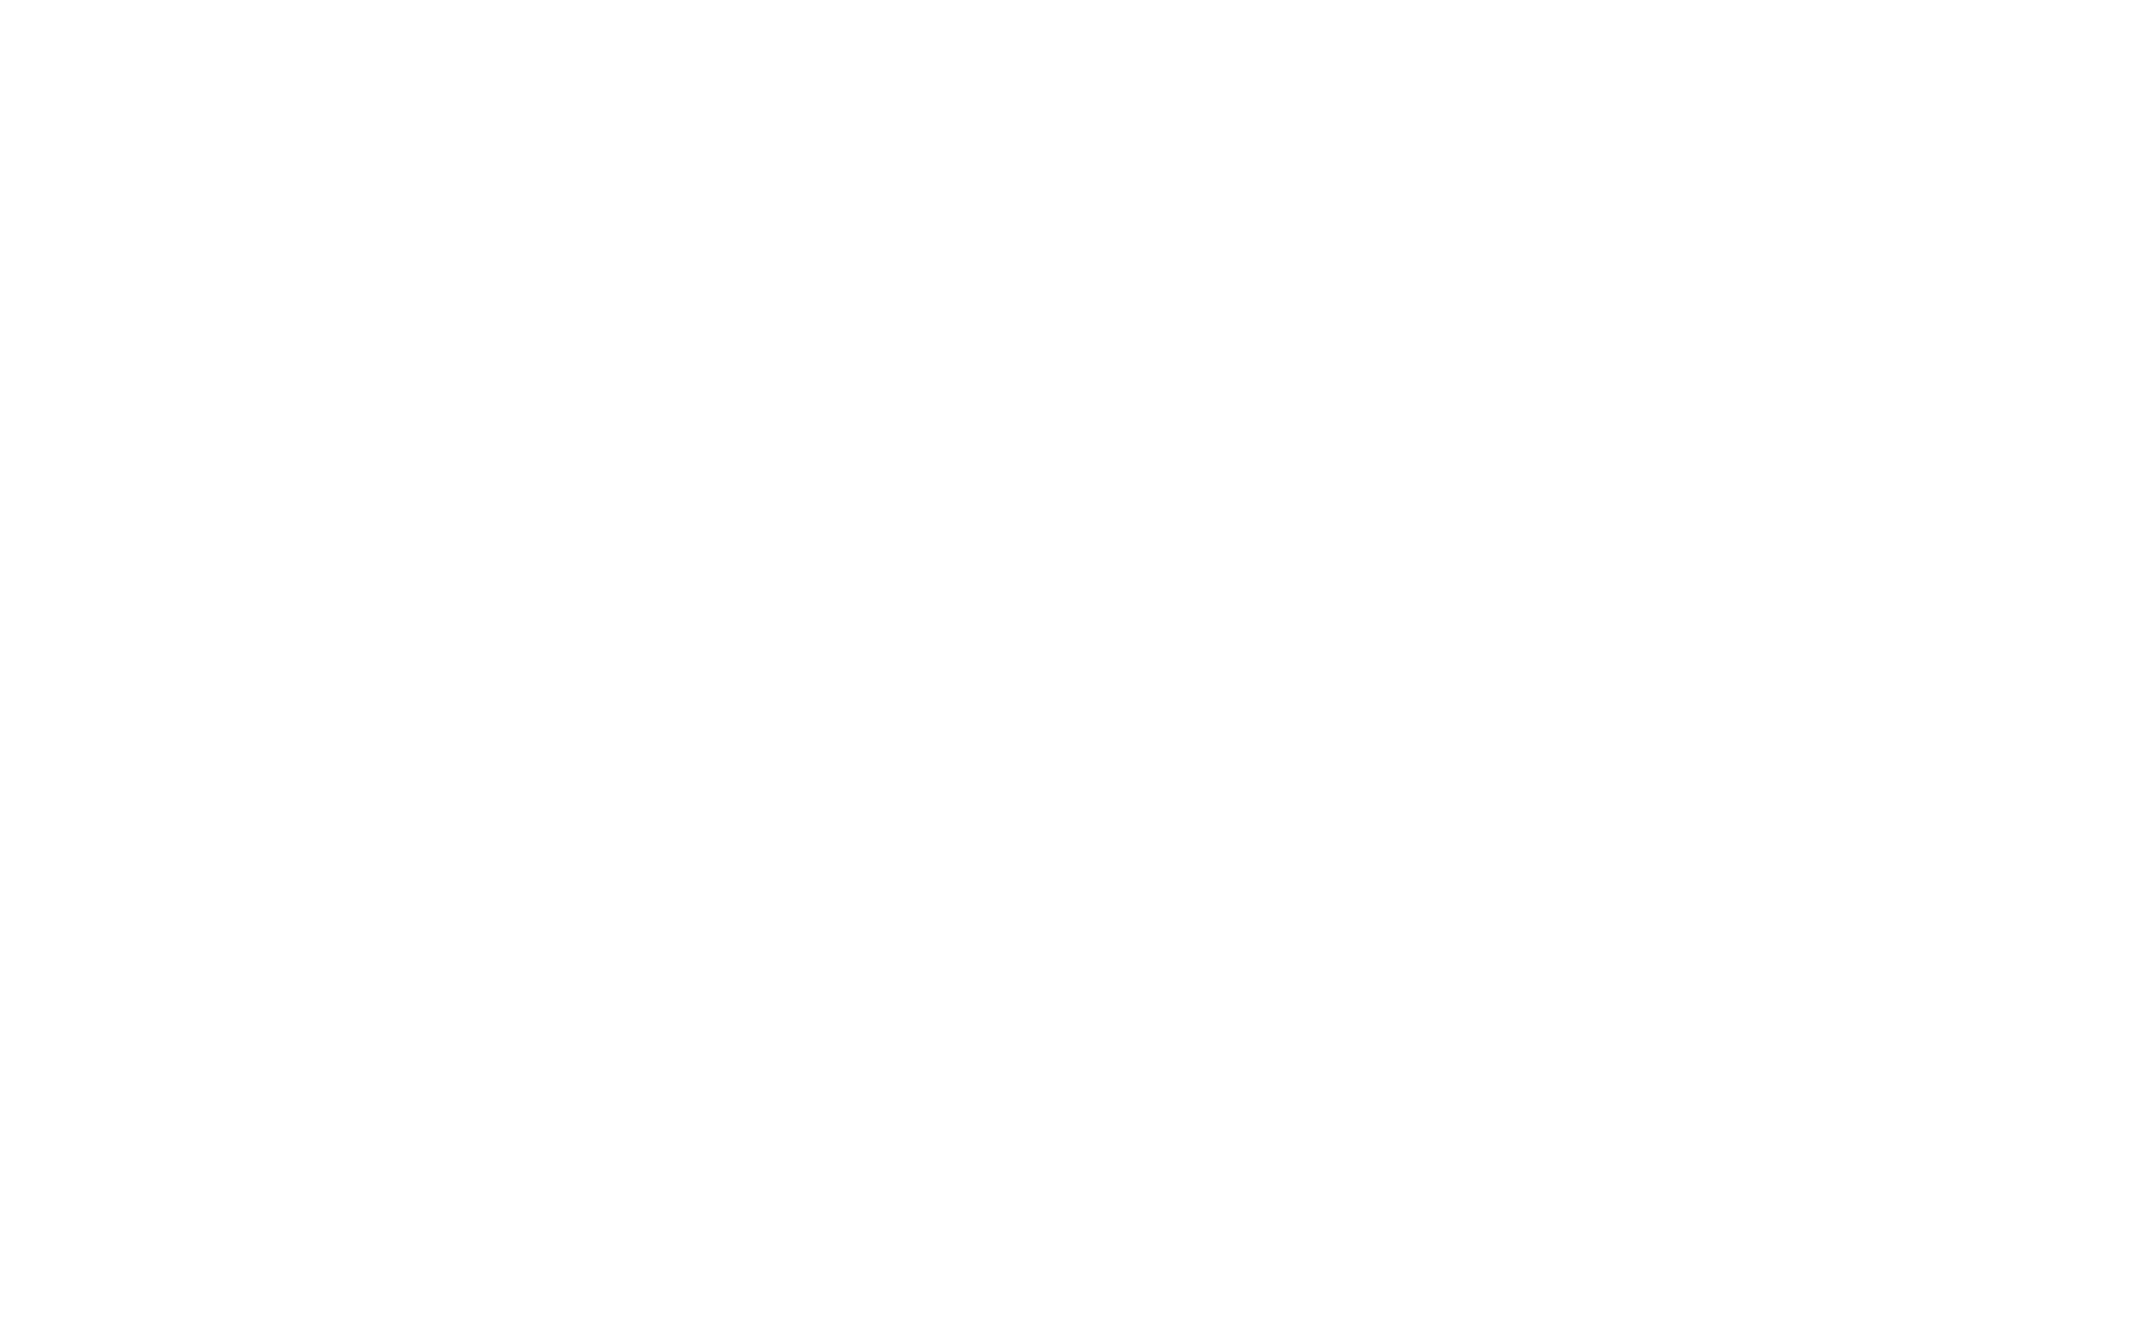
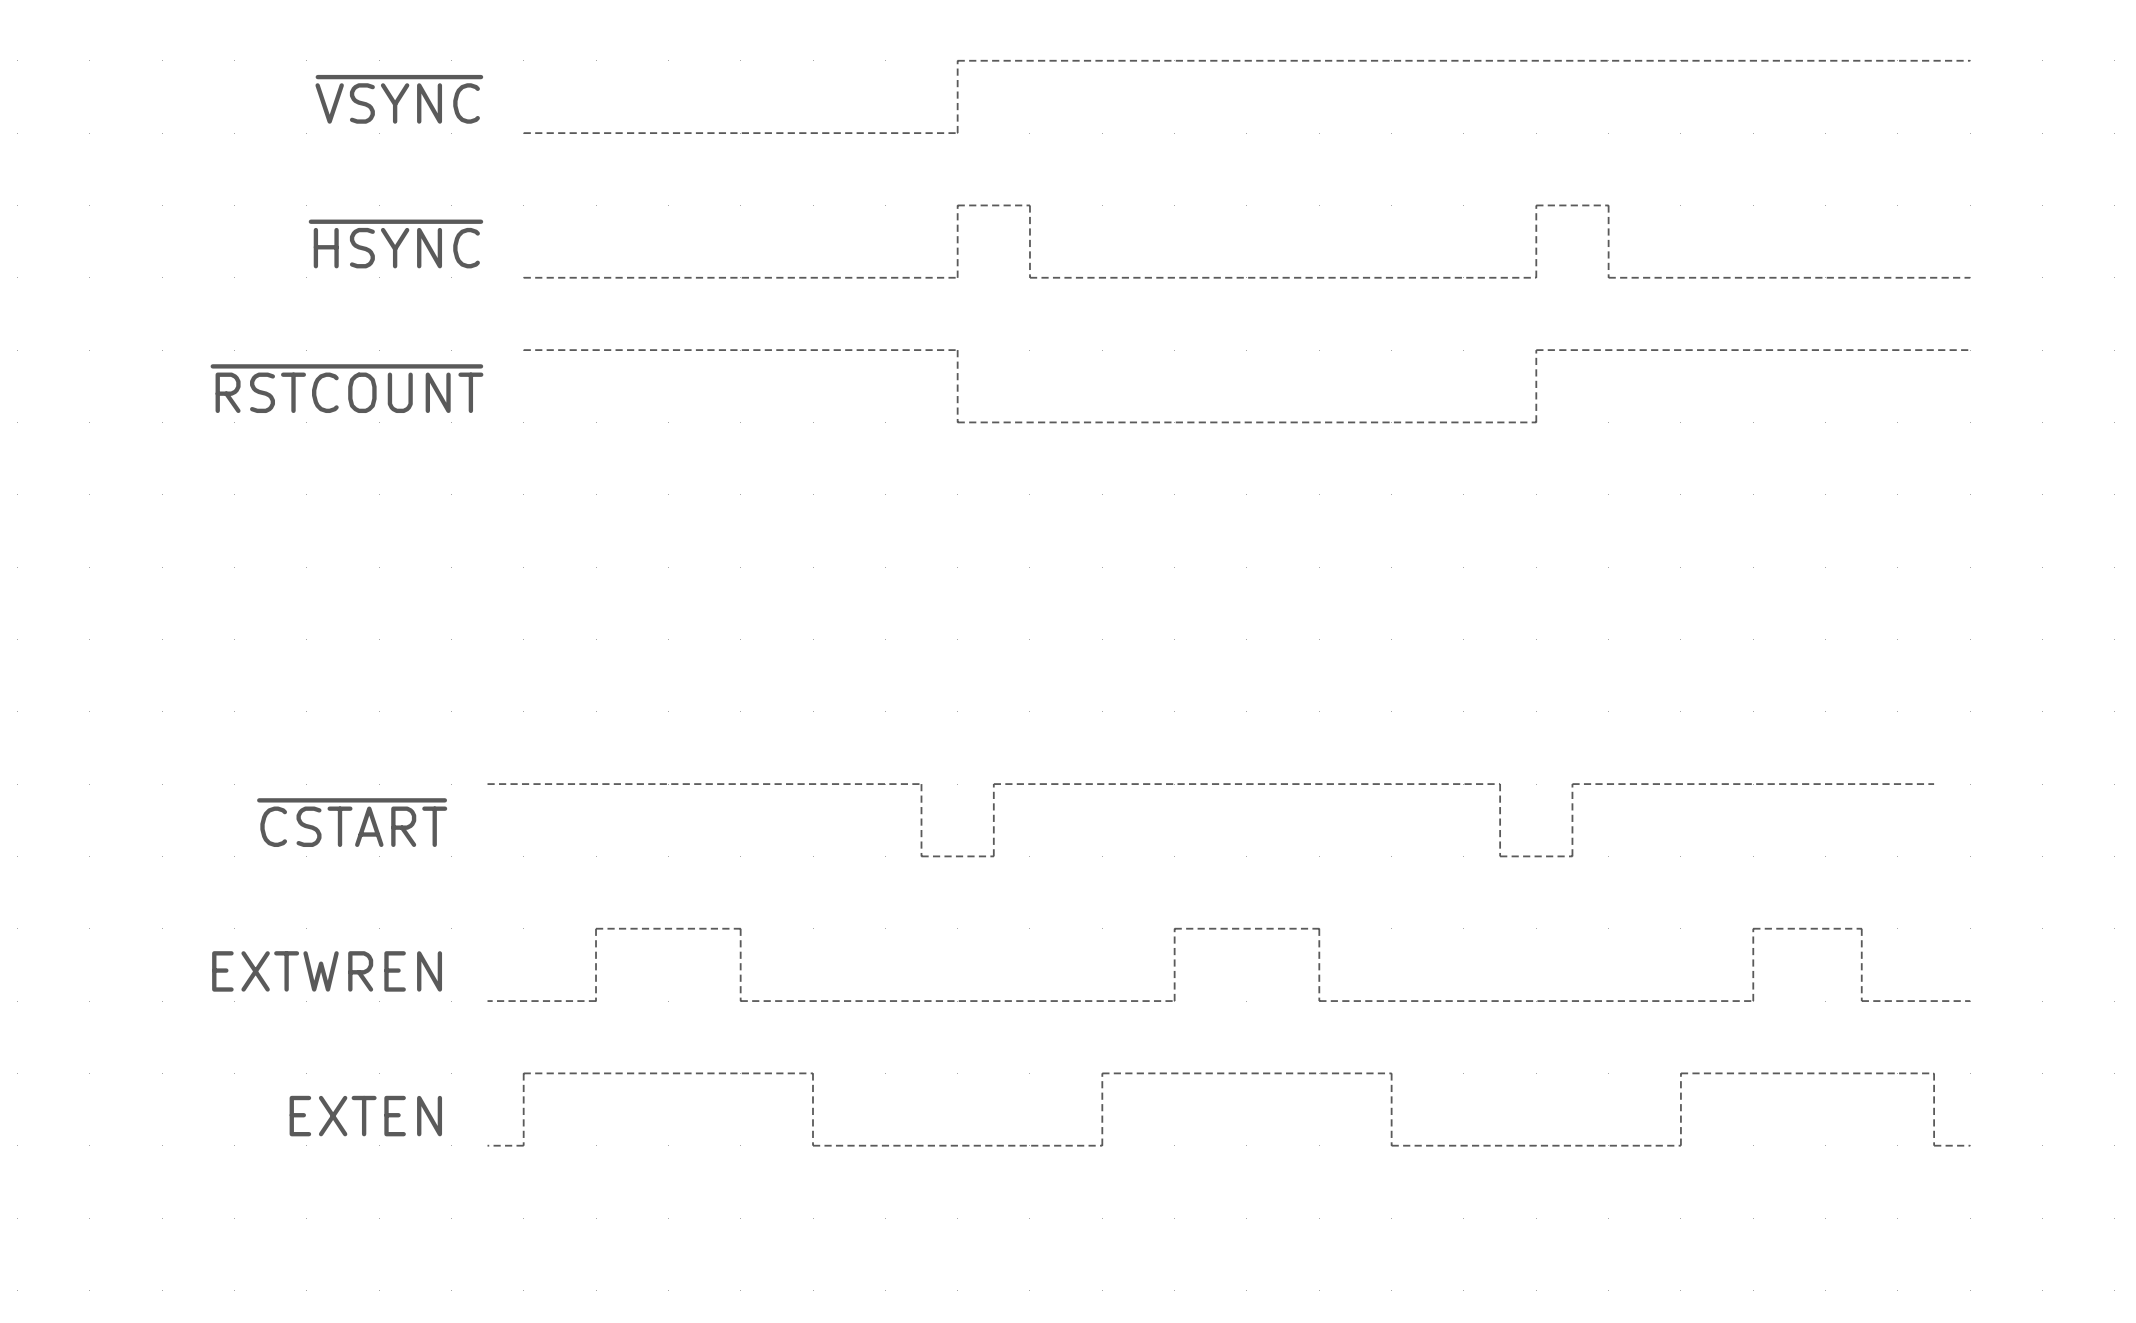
line: none -> (1970, 60) (957, 60) (957, 133) (523, 133)
text: none -> ~{VSYNC} (399, 99)
text: none -> ~{HSYNC} (395, 243)
line: none -> (523, 277) (957, 277) (957, 205) (1029, 205) (1029, 277) (1536, 277) (1536, 205) (1608, 205) (1608, 277) (1970, 277)
line: none -> (523, 350) (957, 350) (957, 422) (1536, 422) (1536, 350) (1970, 350)
text: none -> ~{RSTCOUNT} (346, 388)
line: none -> (487, 784) (921, 784) (921, 856) (993, 856) (993, 784) (1500, 784) (1500, 856) (1572, 856) (1572, 784) (1934, 784)
text: none -> ~{CSTART} (352, 822)
text: none -> EXTWREN (327, 971)
line: none -> (487, 1001) (596, 1001) (596, 928) (740, 928) (740, 1001) (1174, 1001) (1174, 928) (1319, 928) (1319, 1001) (1753, 1001) (1753, 928) (1861, 928) (1861, 1001) (1970, 1001)
text: none -> EXTEN (365, 1116)
line: none -> (487, 1145) (523, 1145) (523, 1073) (813, 1073) (813, 1145) (1102, 1145) (1102, 1073) (1391, 1073) (1391, 1145) (1680, 1145) (1680, 1073) (1934, 1073) (1934, 1145) (1970, 1145)

